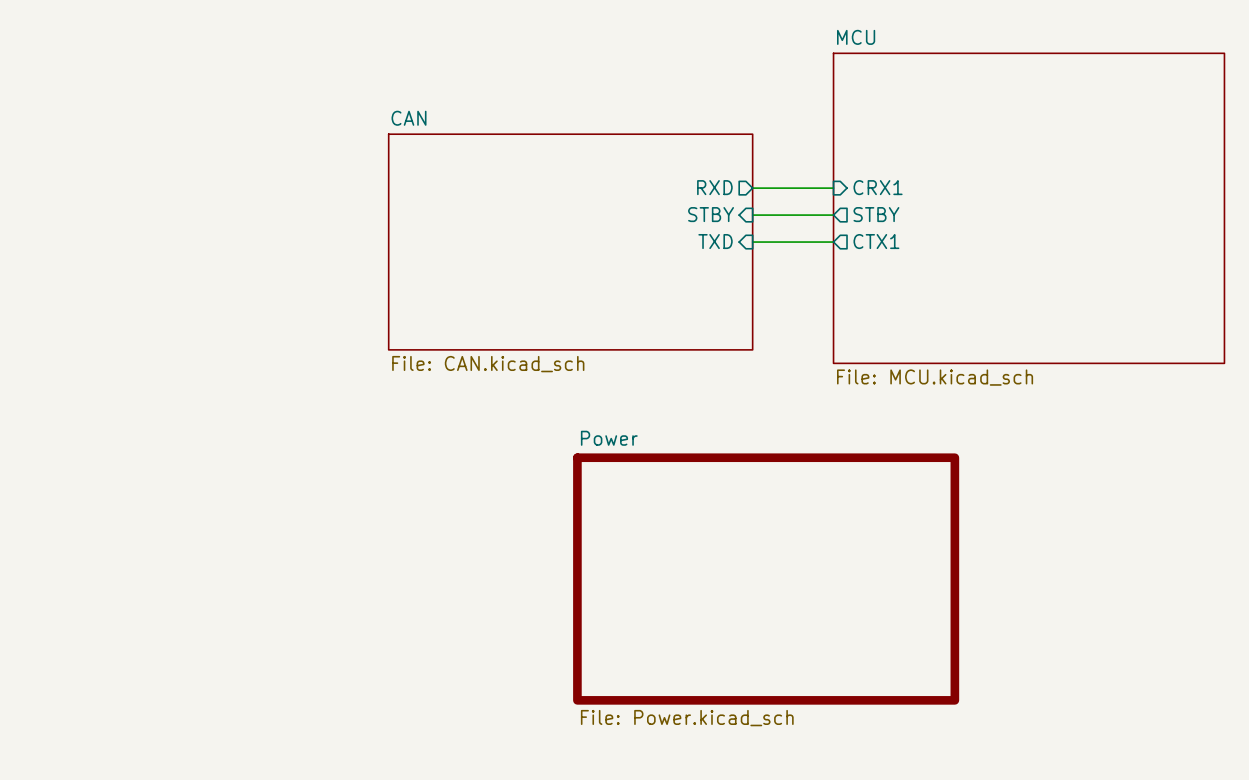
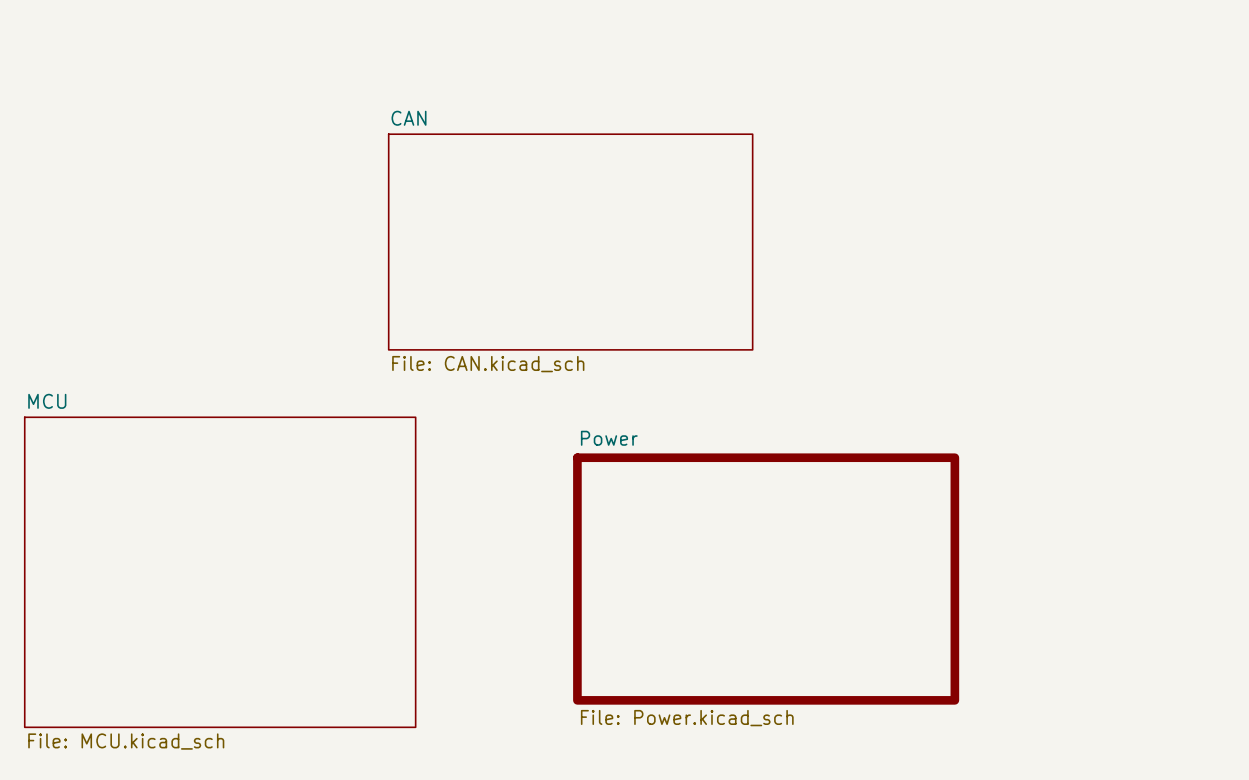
sheet pin: RXD (714, 187) -> none
sheet pin: CRX1 (878, 187) -> none
wire: (752, 188) (833, 188) -> none
sheet MCU: File: MCU.kicad_sch (1028, 208) -> none
sheet pin: STBY (711, 214) -> none
sheet pin: STBY (876, 214) -> none
wire: (752, 215) (833, 215) -> none
sheet pin: TXD (715, 241) -> none
sheet pin: CTX1 (876, 241) -> none
wire: (752, 242) (833, 242) -> none
sheet MCU: none -> File: MCU.kicad_sch (220, 572)

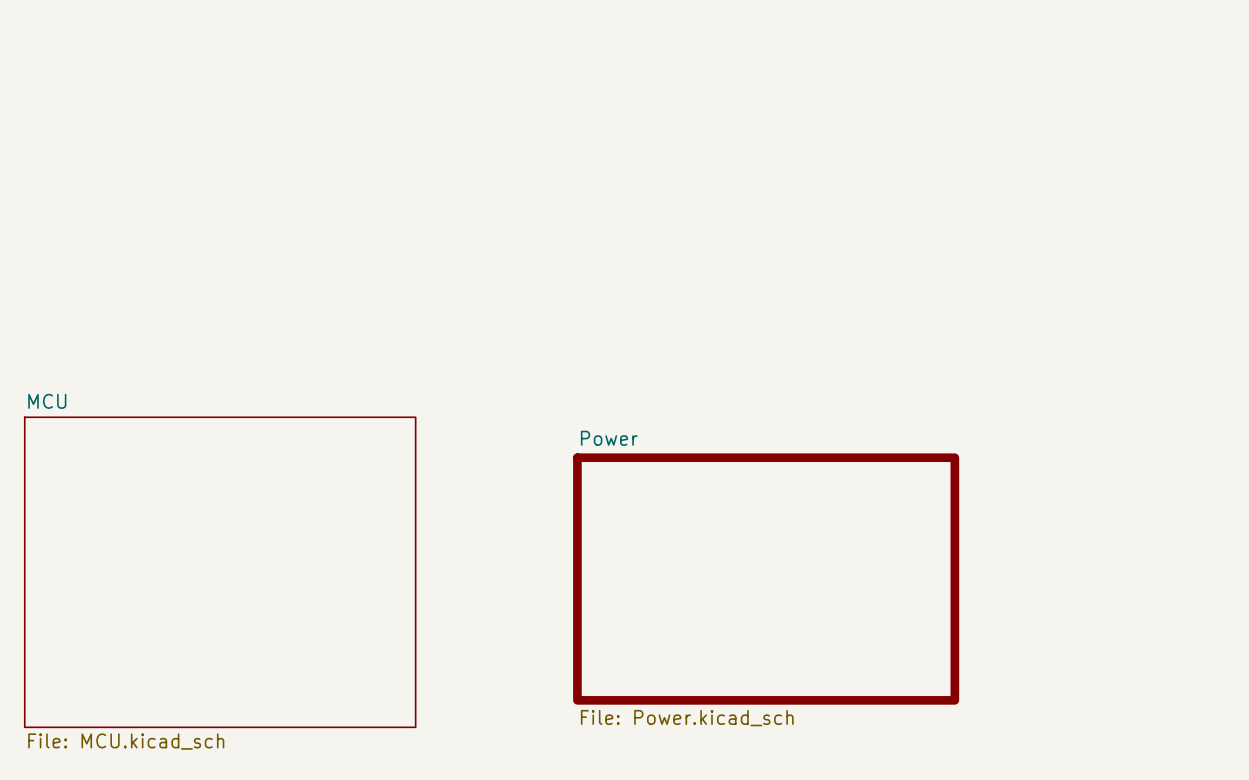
sheet CAN: File: CAN.kicad_sch (570, 242) -> none

